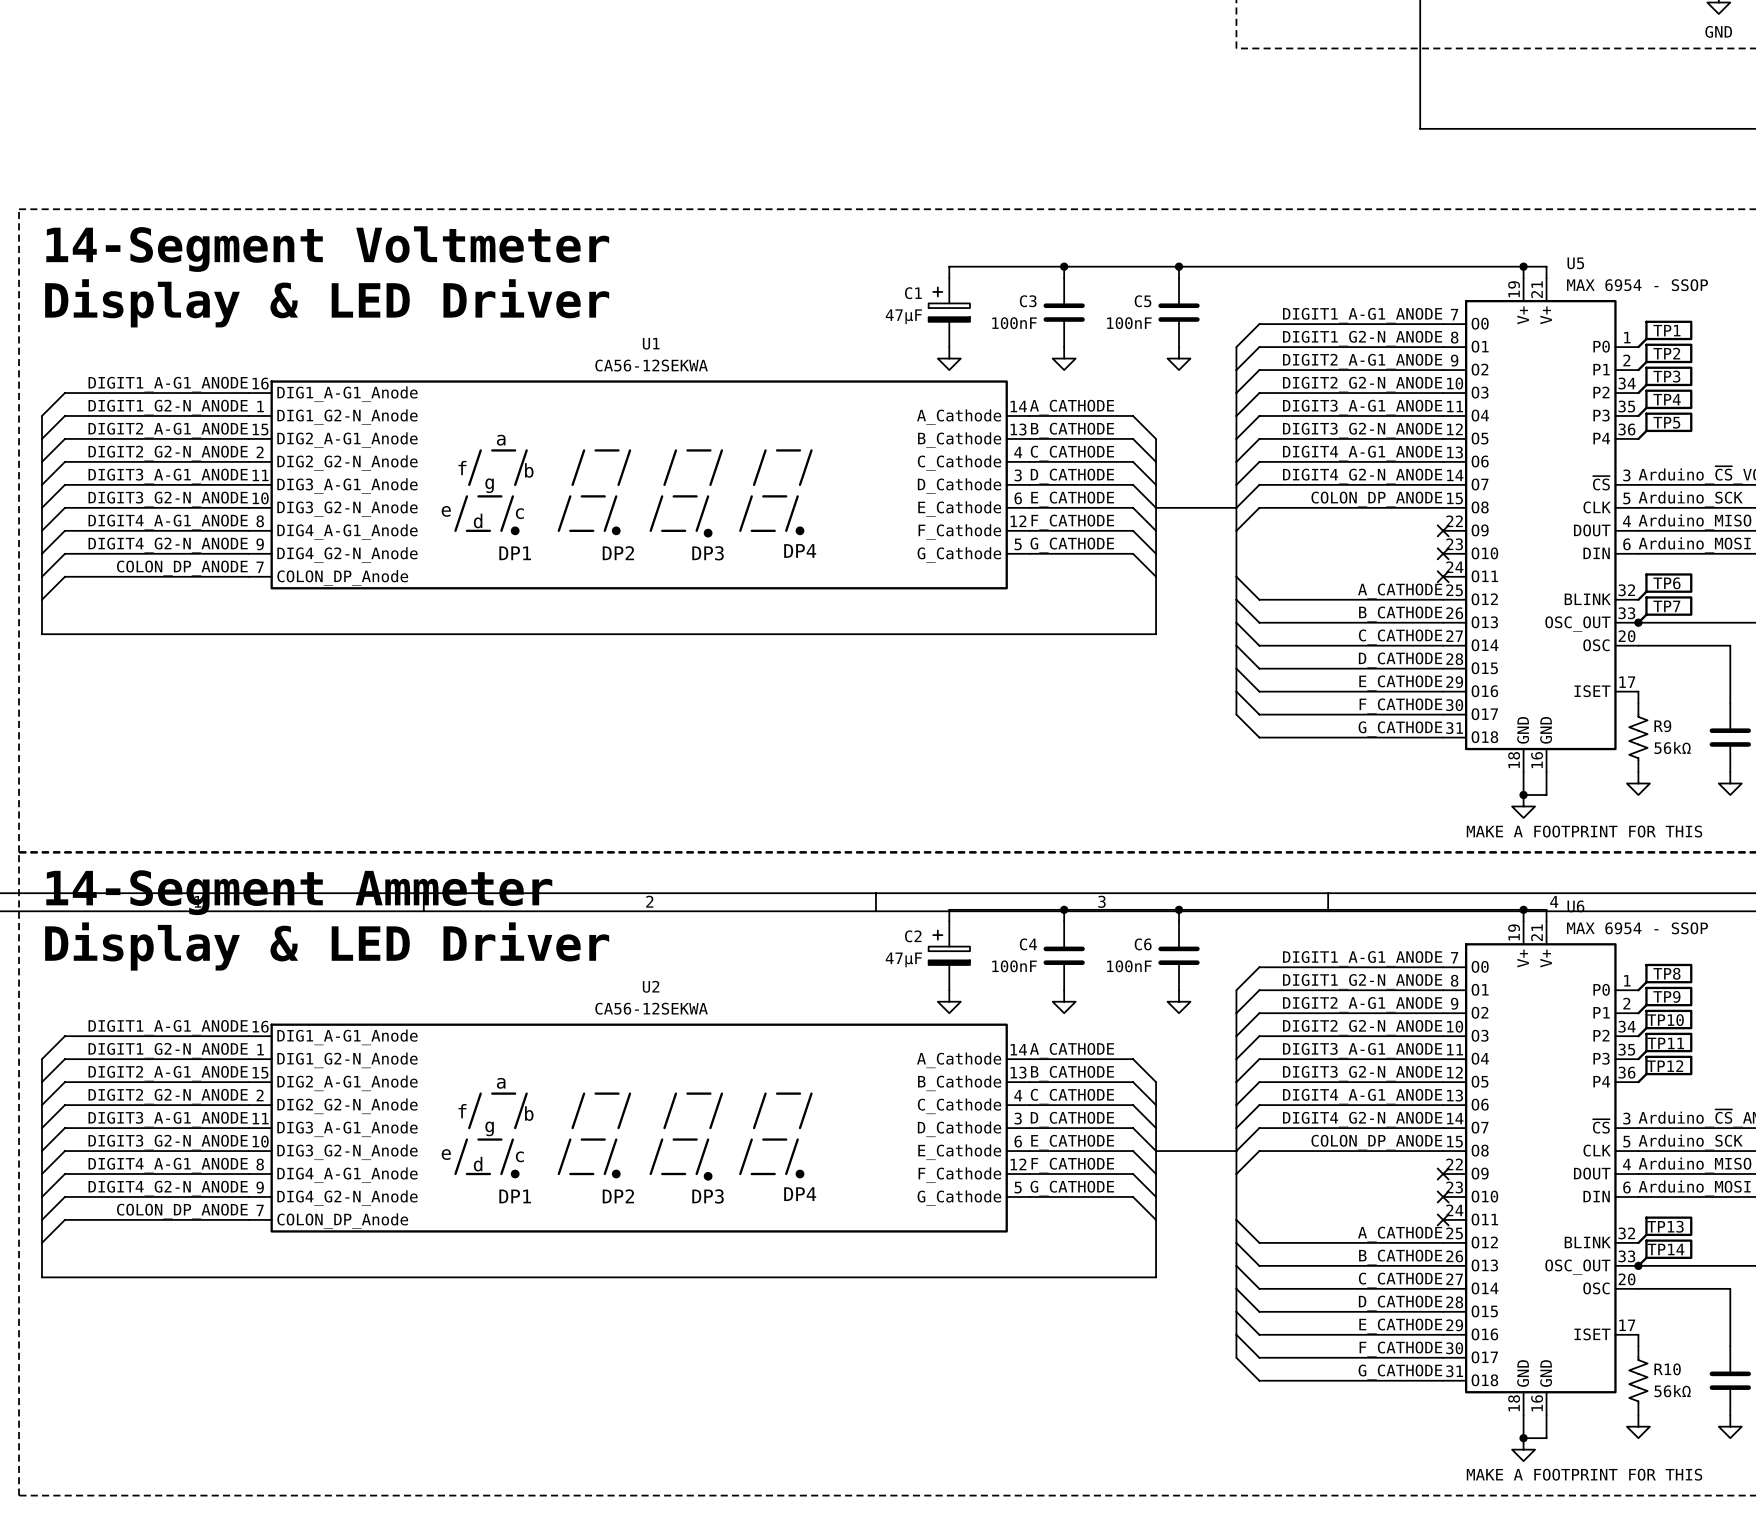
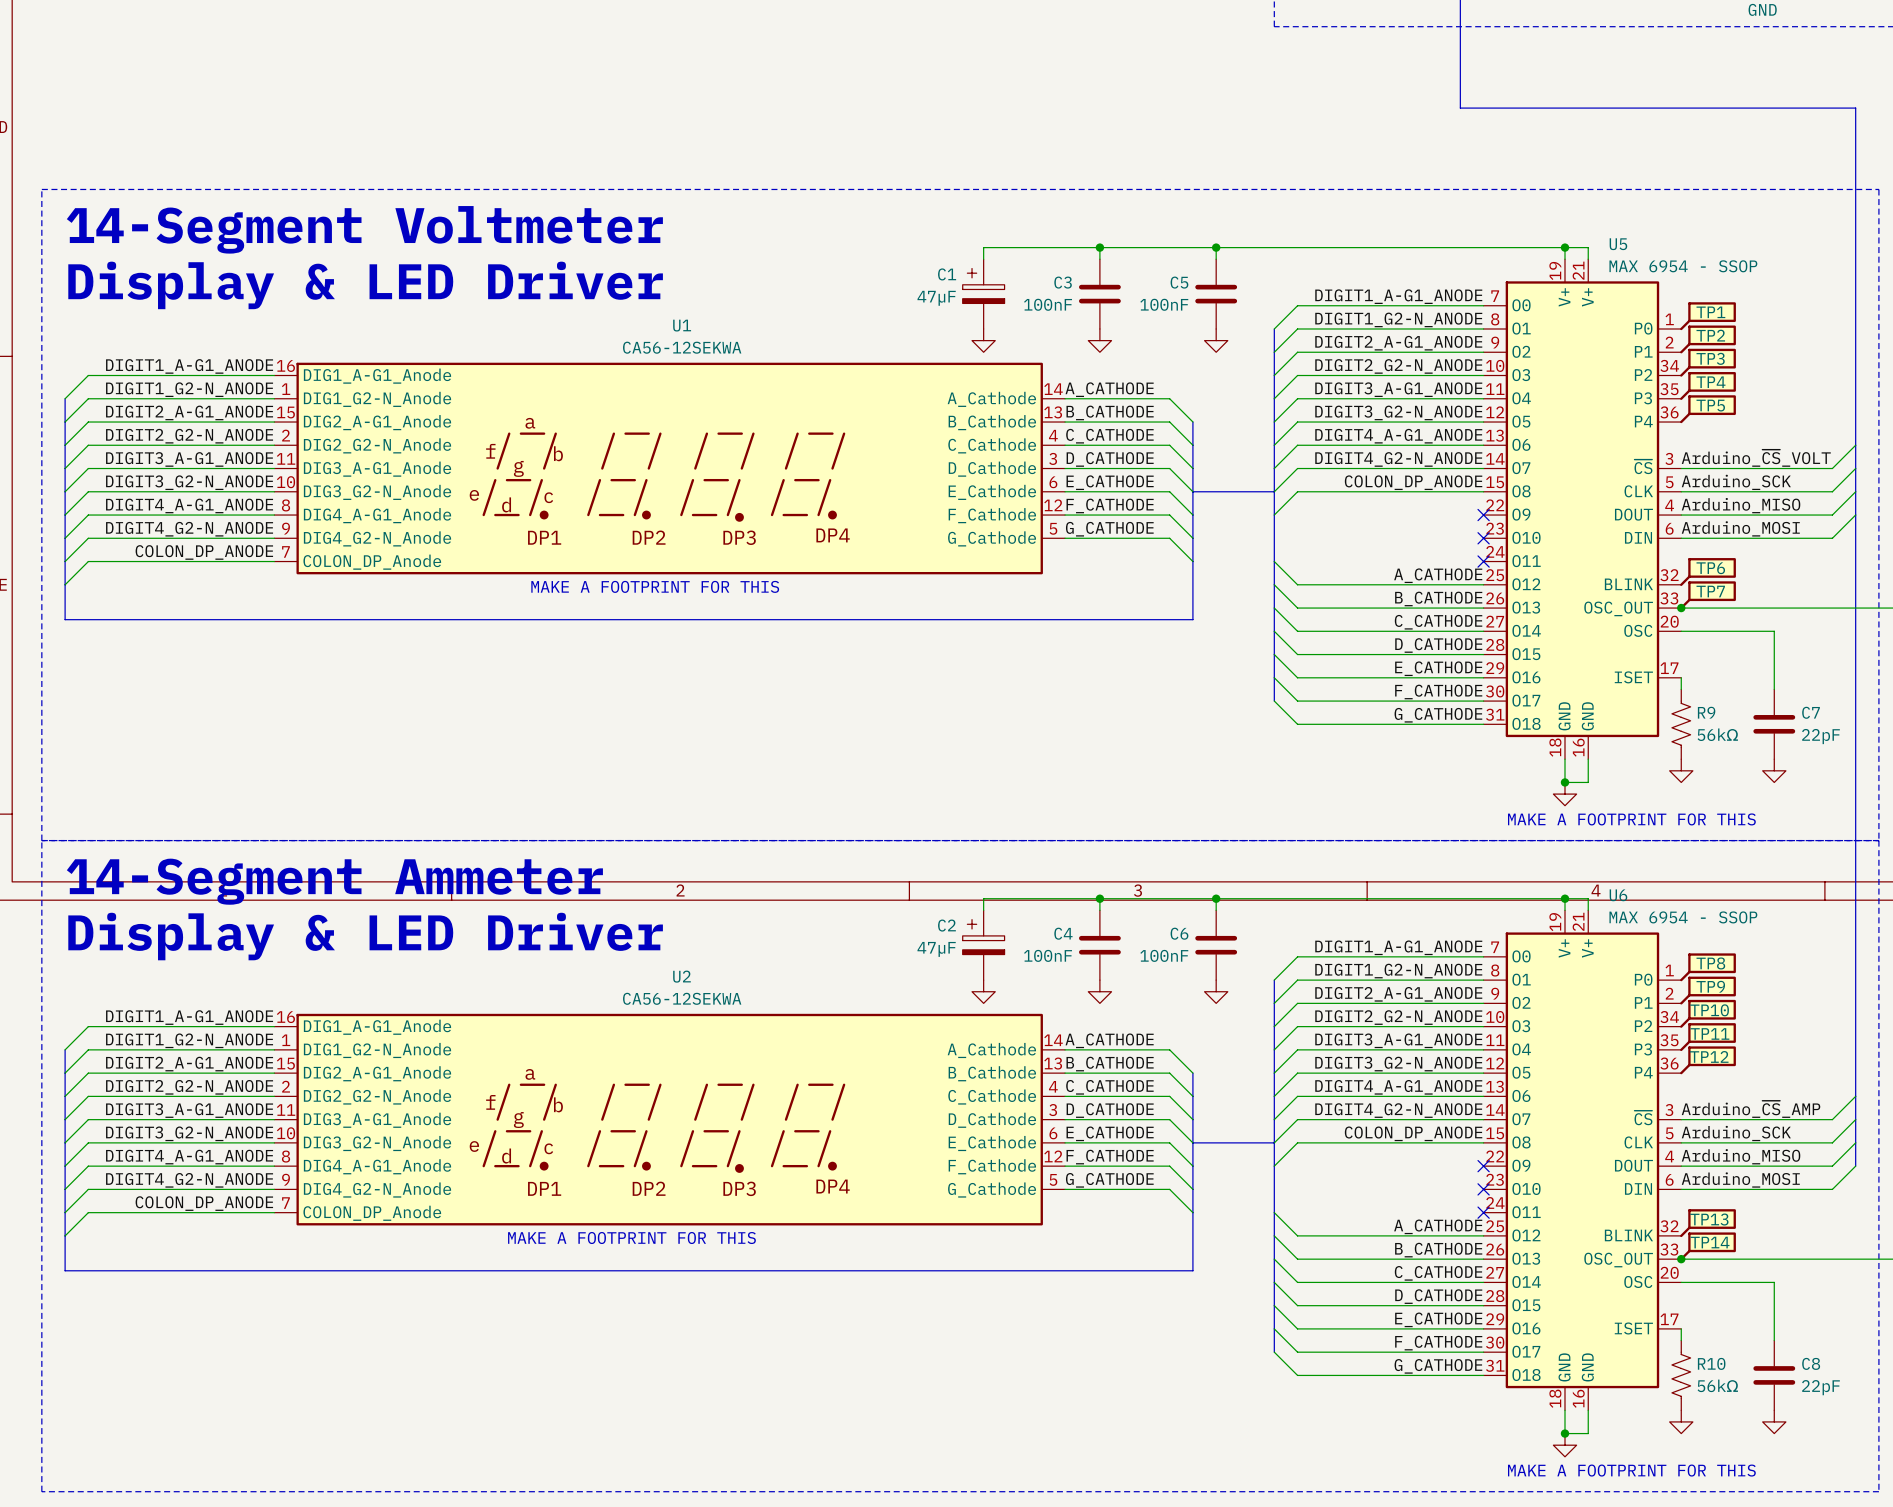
text: none -> MAKE A FOOTPRINT FOR THIS (655, 586)
text: none -> MAKE A FOOTPRINT FOR THIS (631, 1238)

